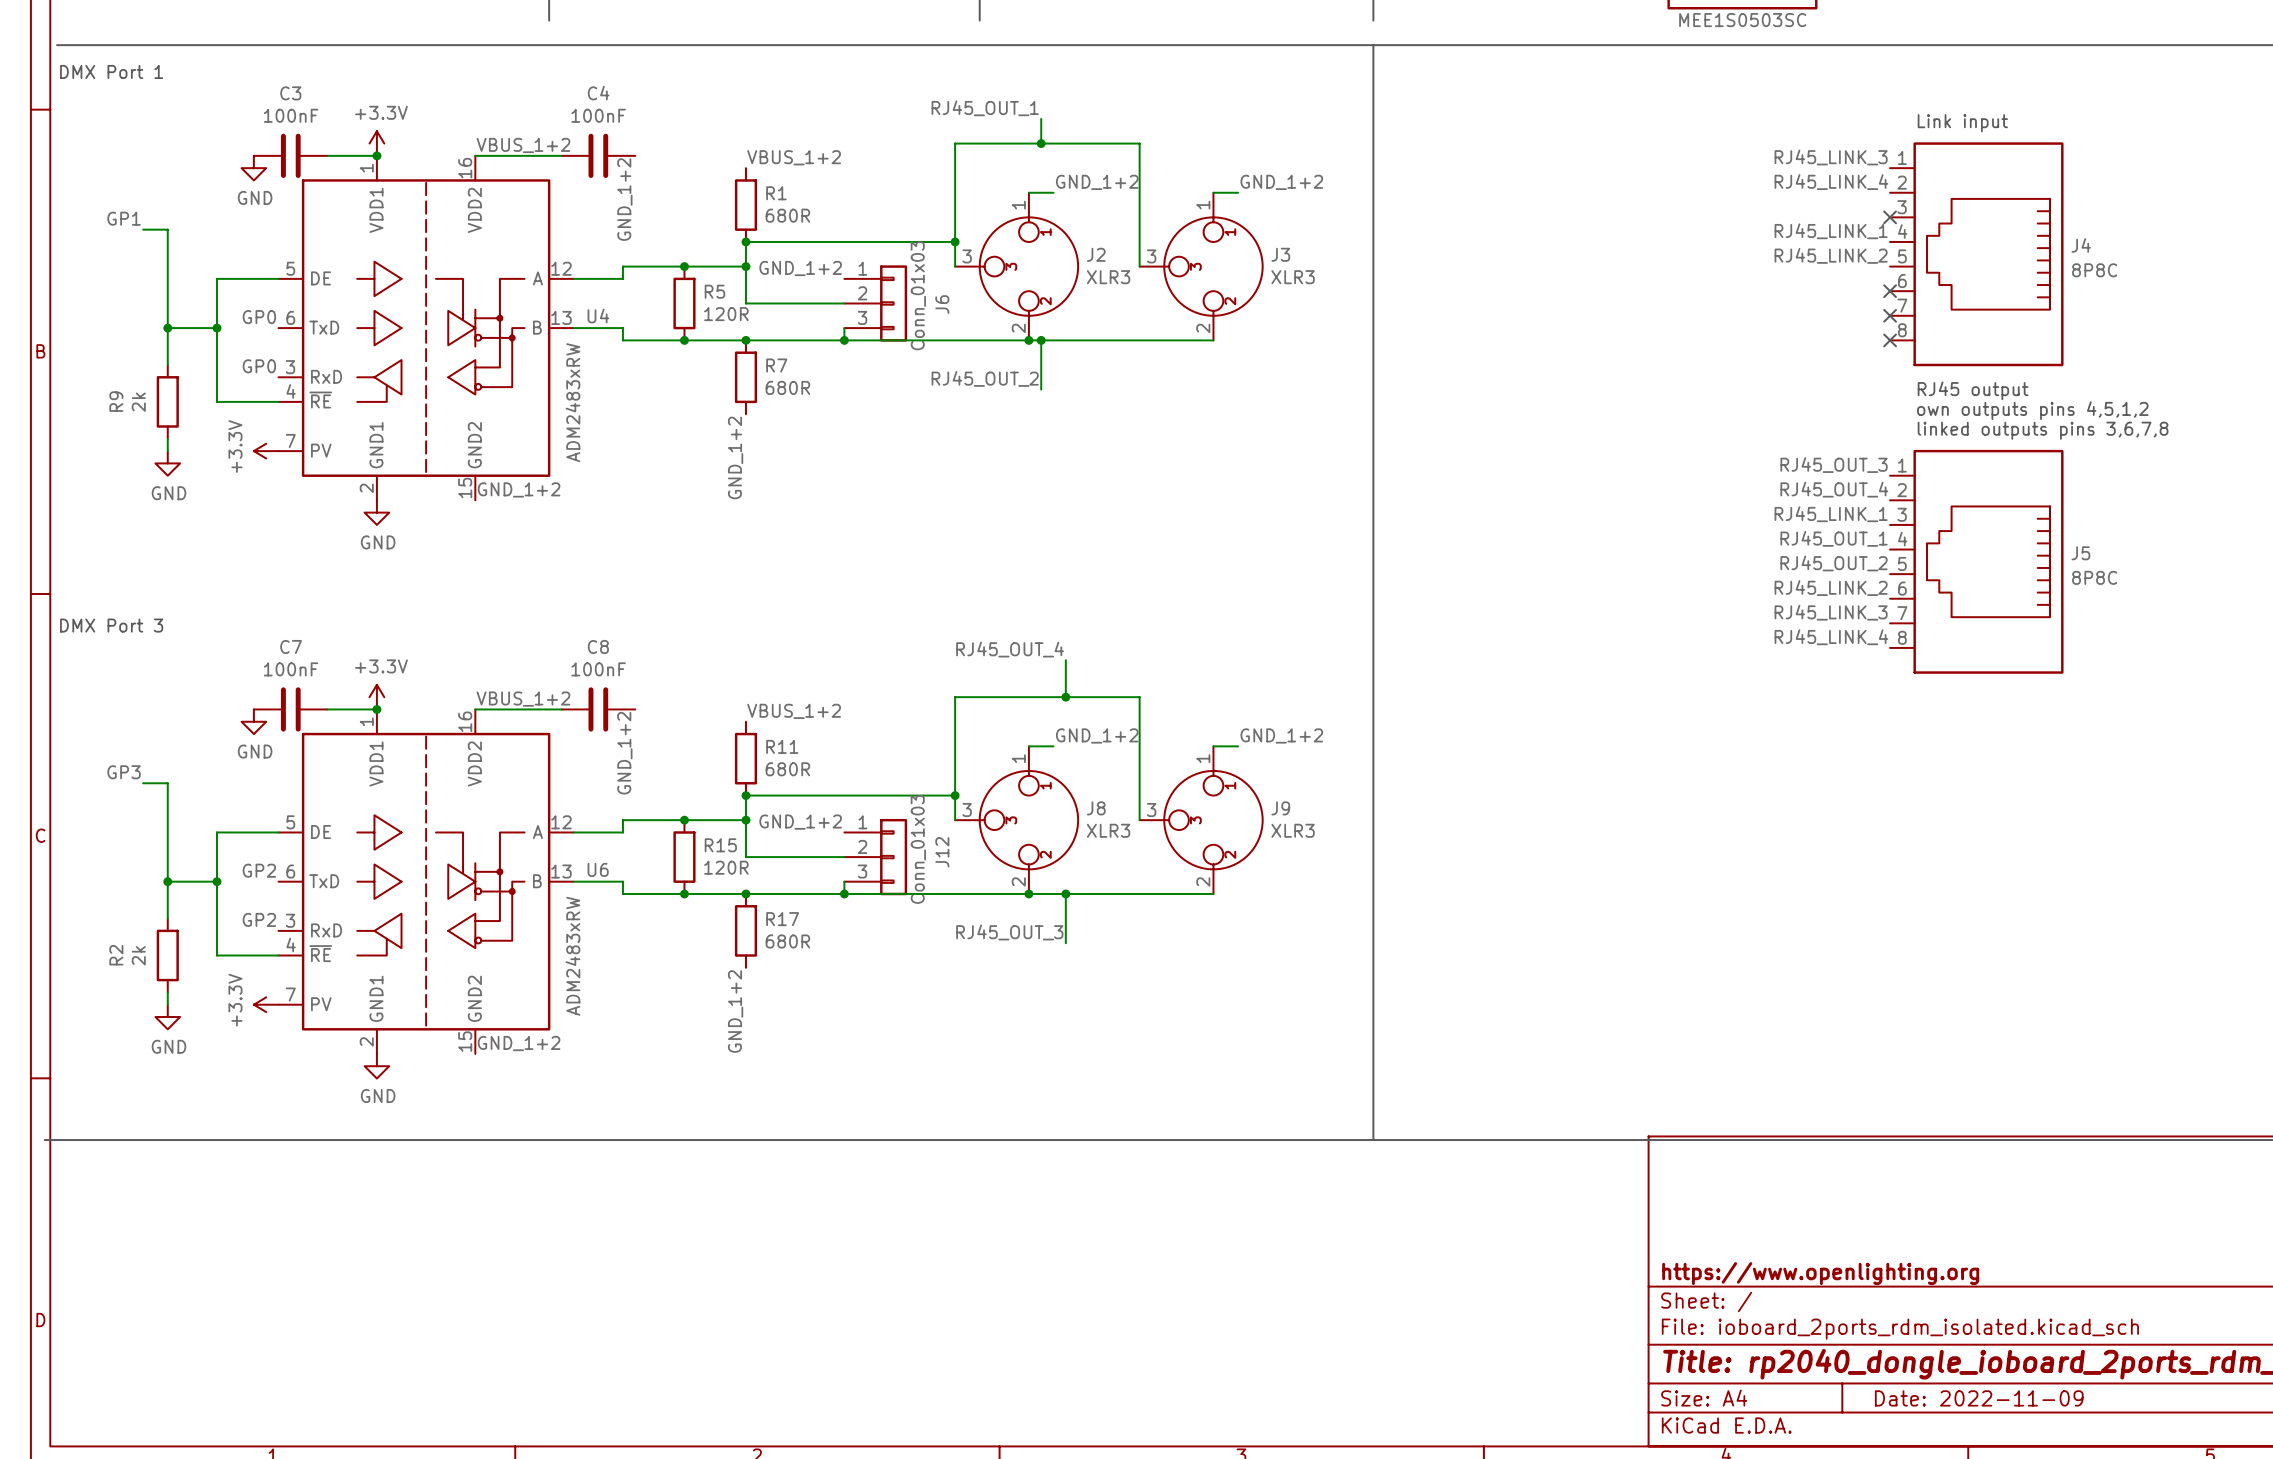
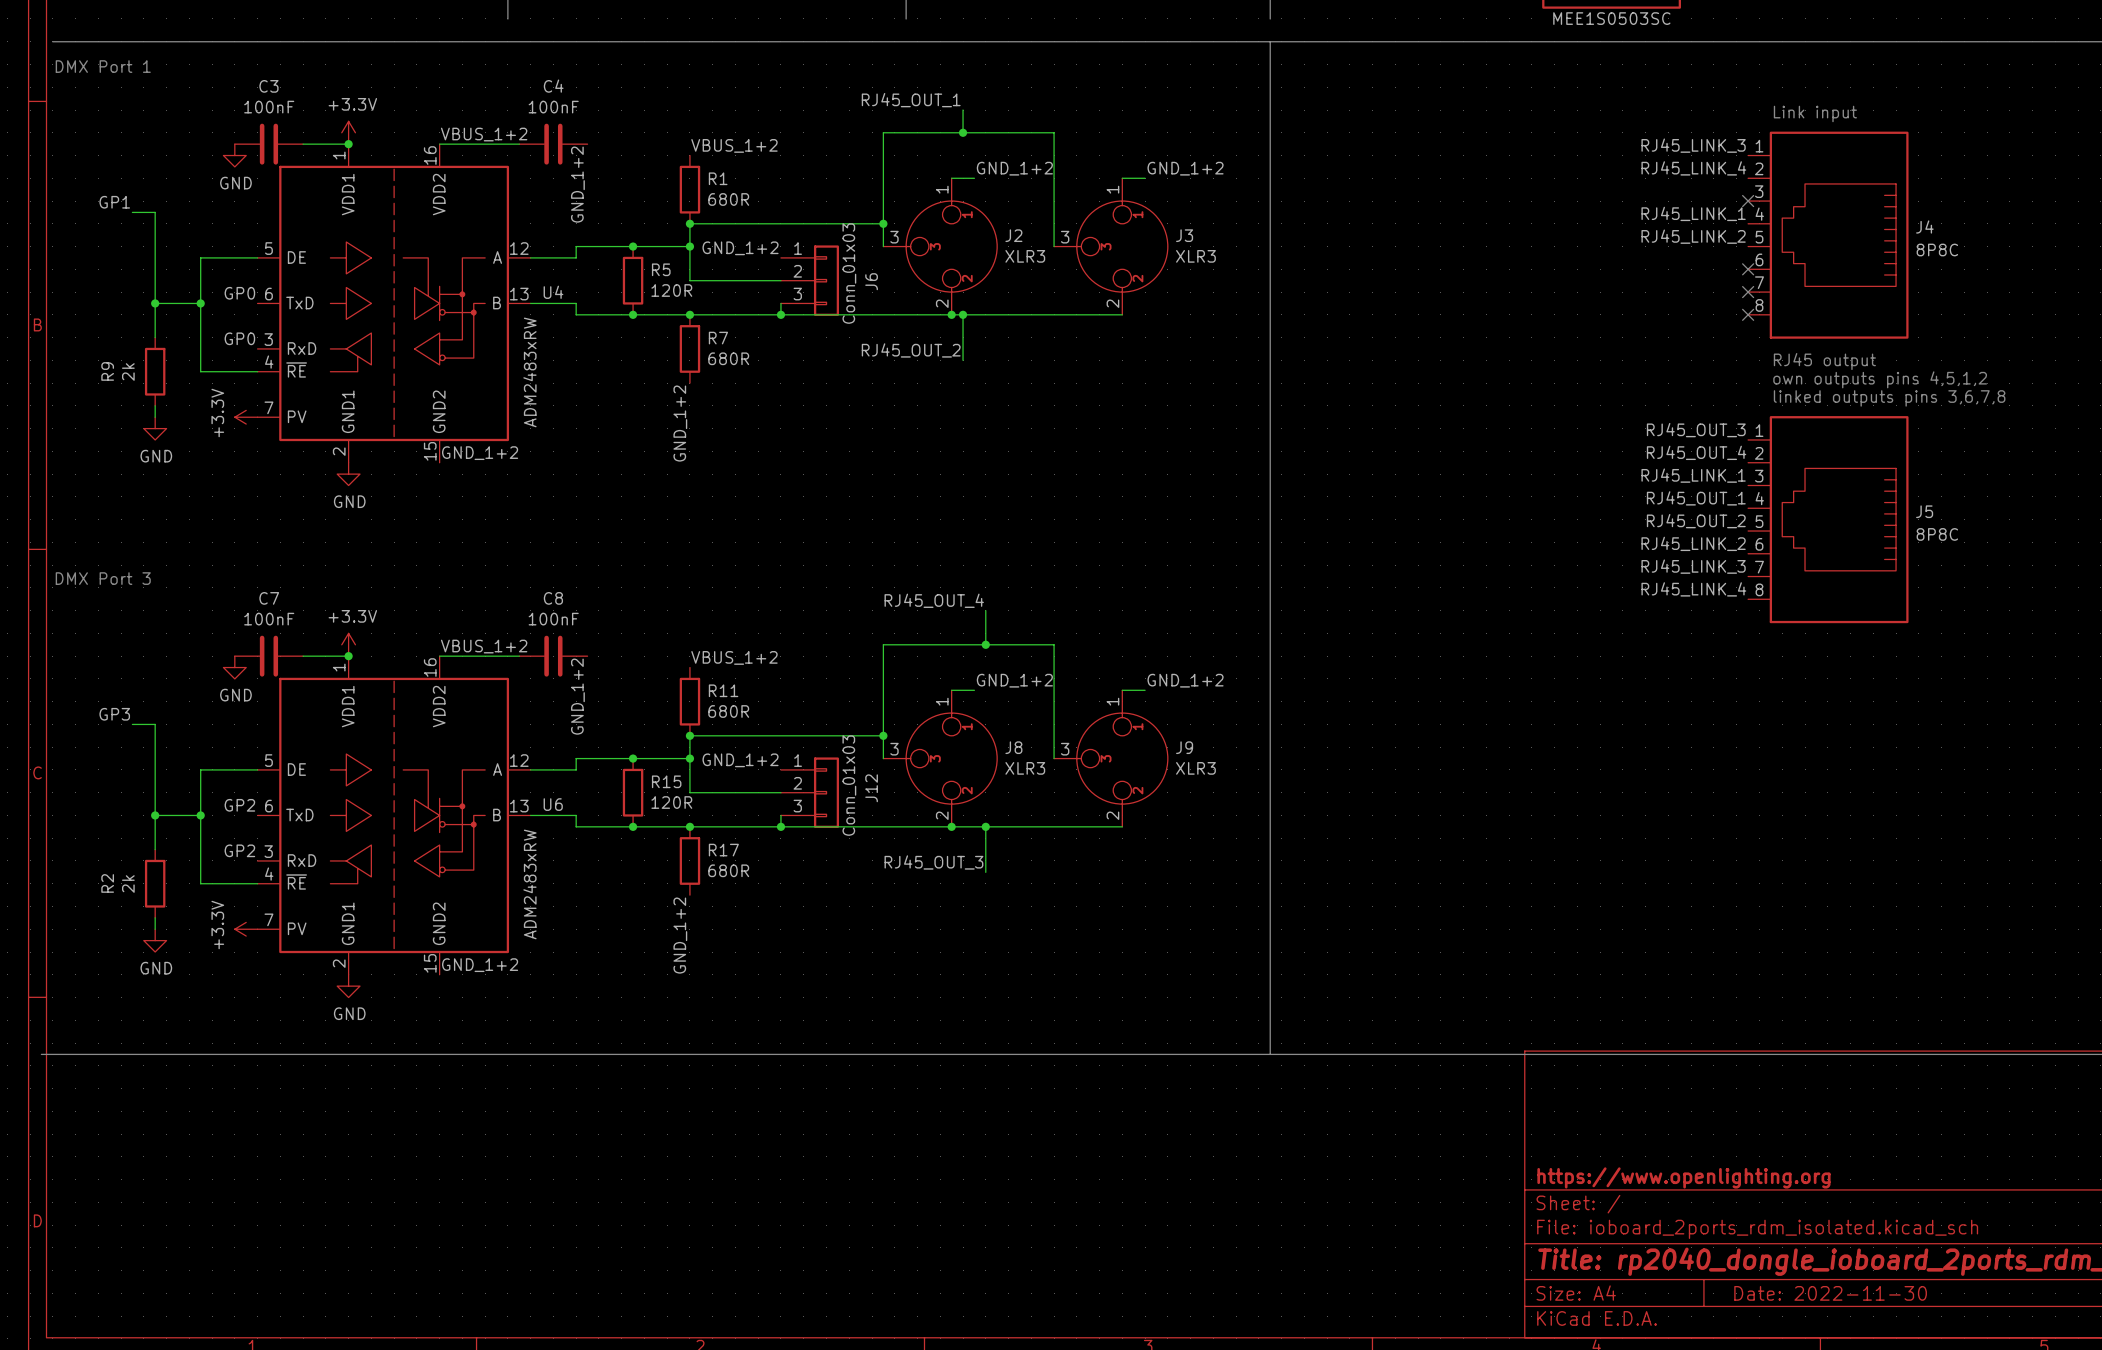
title block: Date: 2022-11-09 (1979, 1398) -> Date: 2022-11-30 (1830, 1293)

